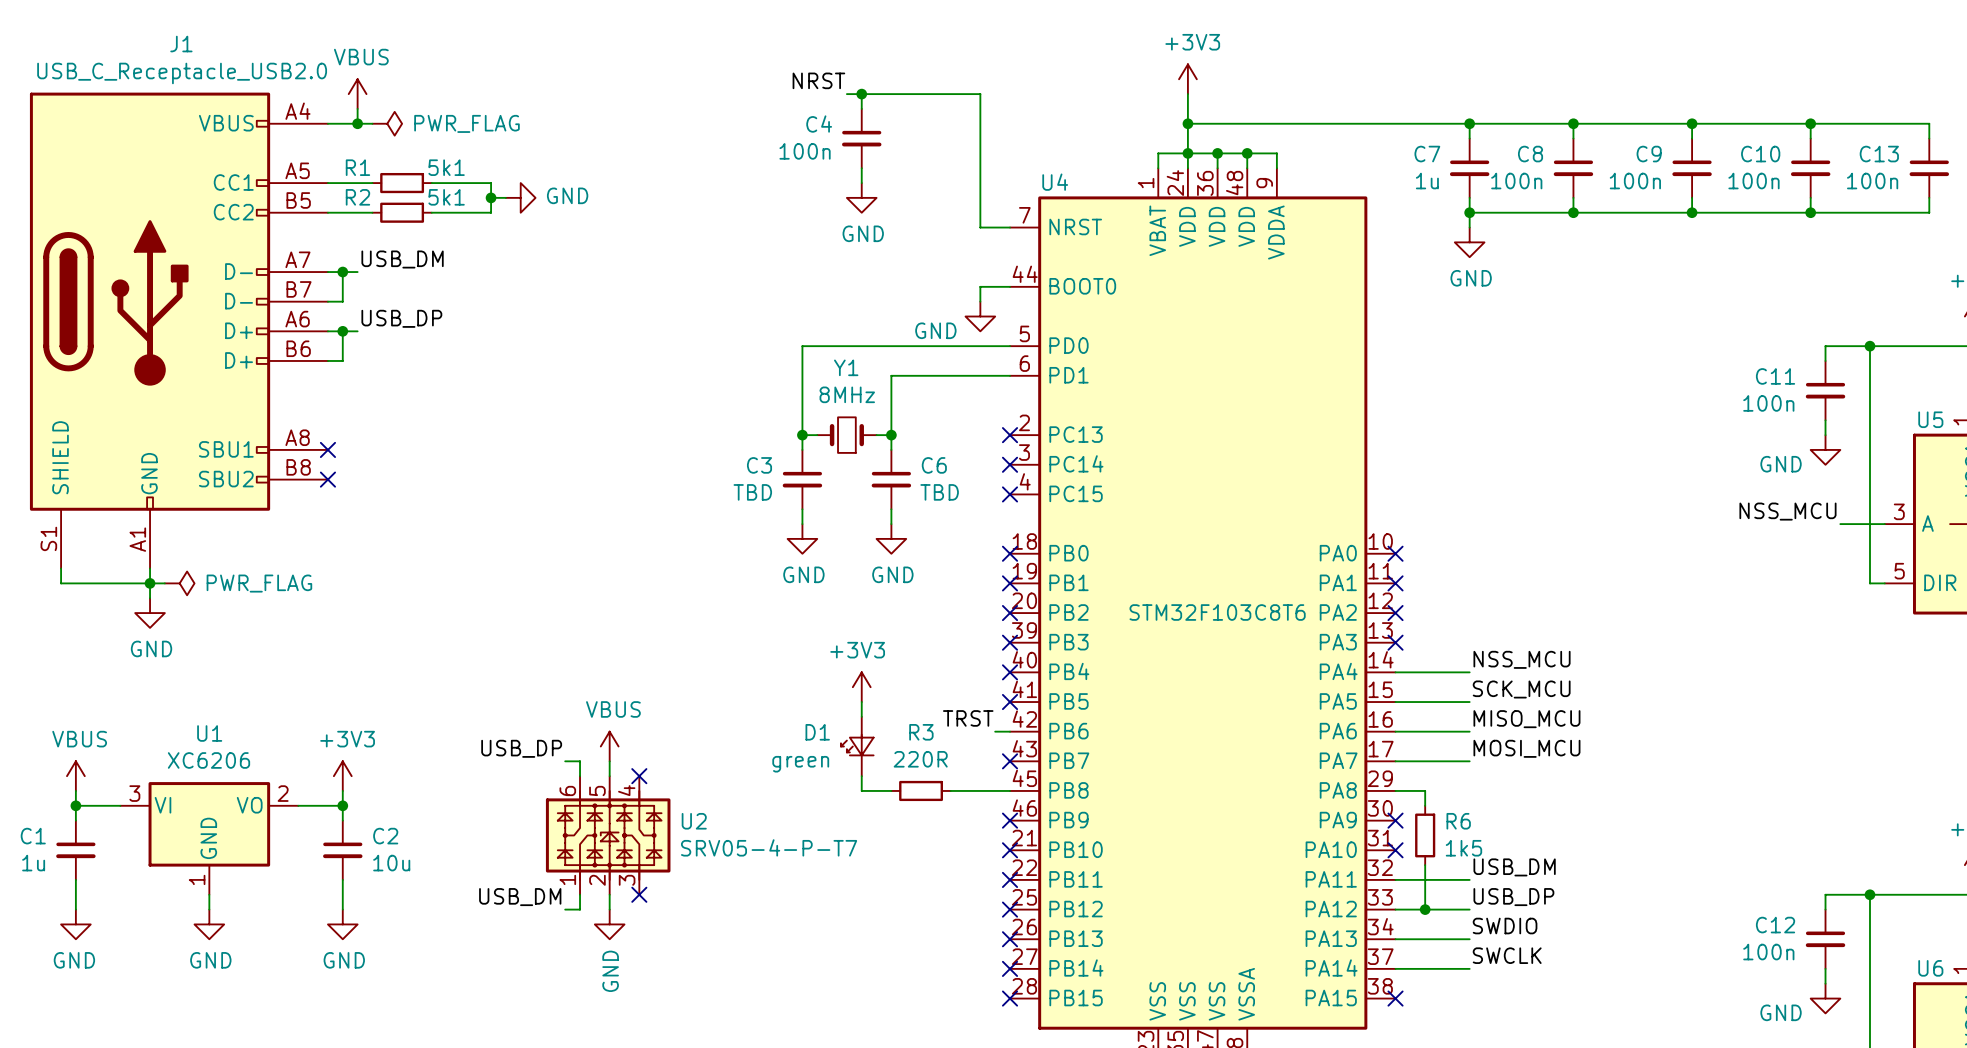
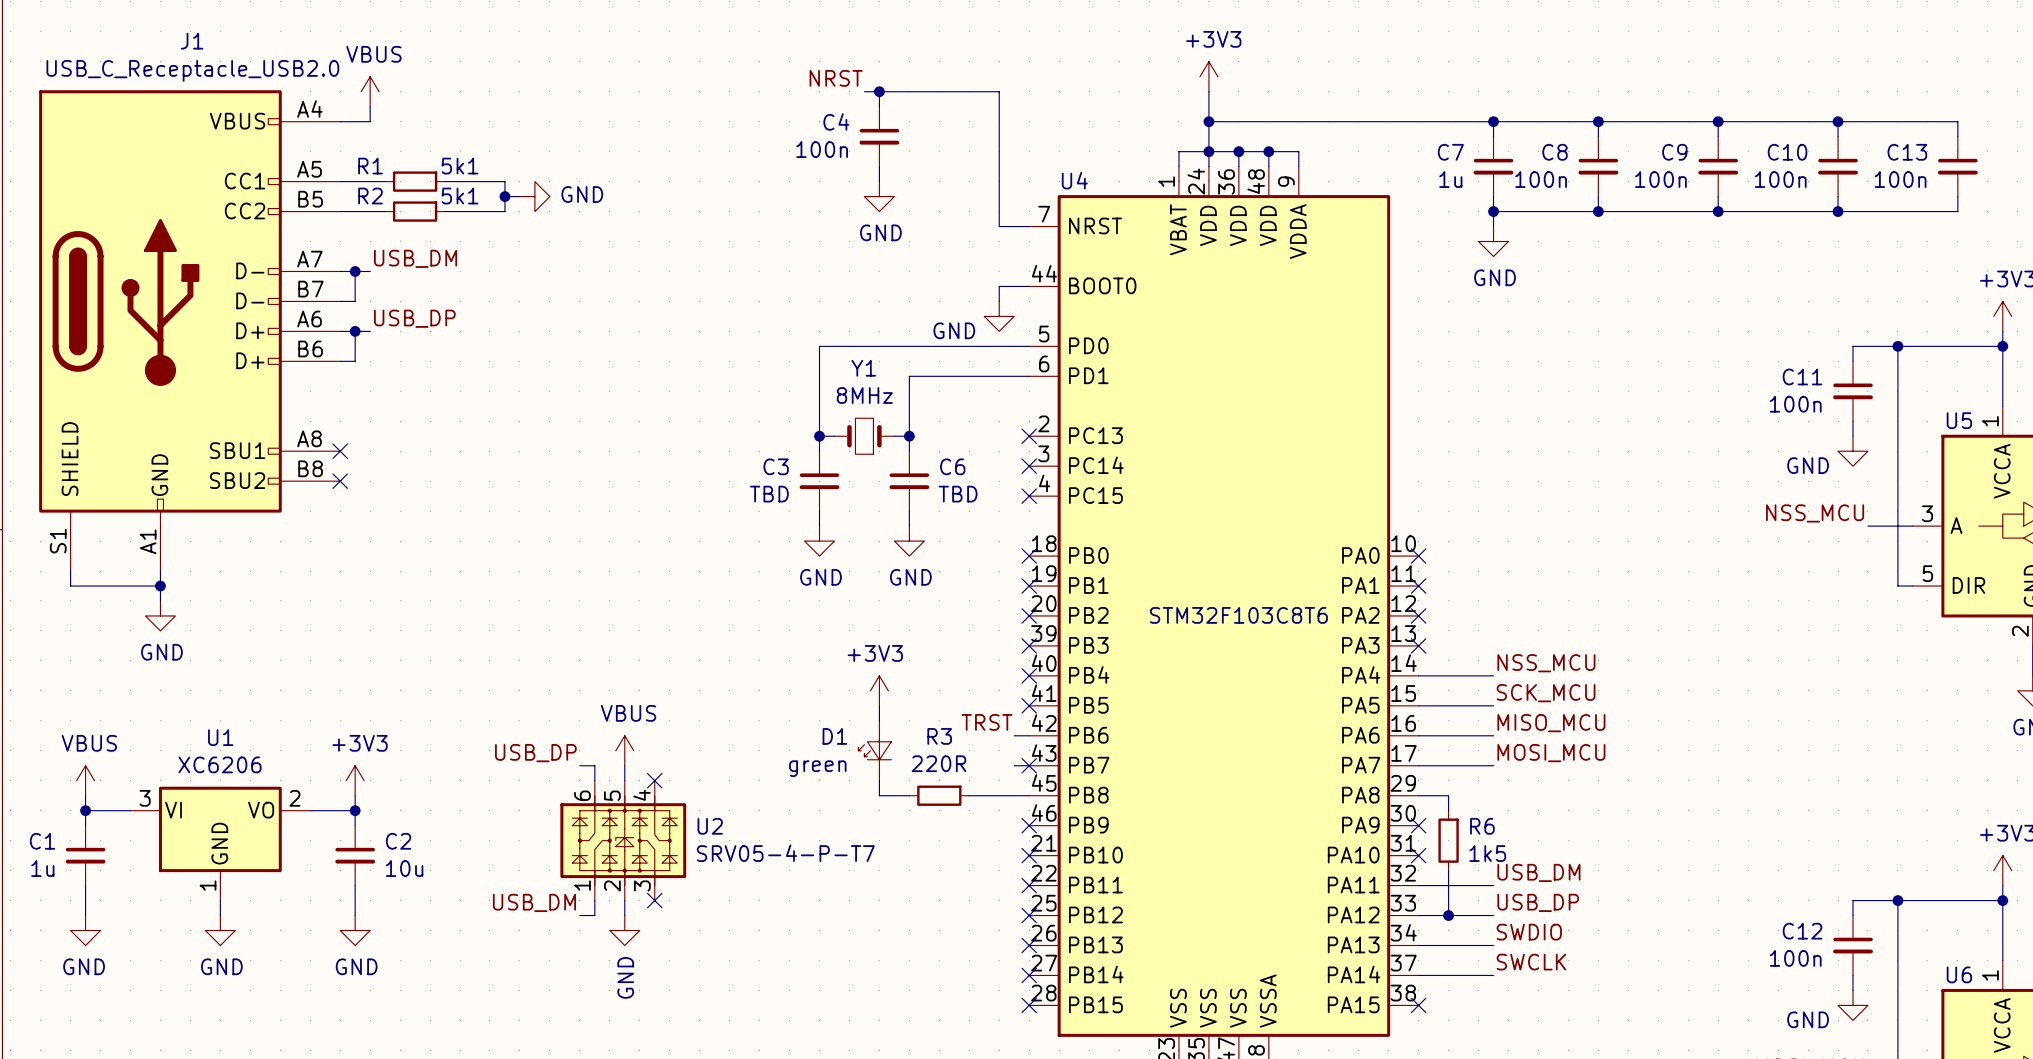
wire: (357, 123) (372, 123) -> none
junction: (357, 123) -> none
power symbol: PWR_FLAG (387, 123) -> none
wire: (150, 583) (164, 583) -> none
power symbol: PWR_FLAG (179, 583) -> none
wire: none -> (1014, 765) (1029, 765)

